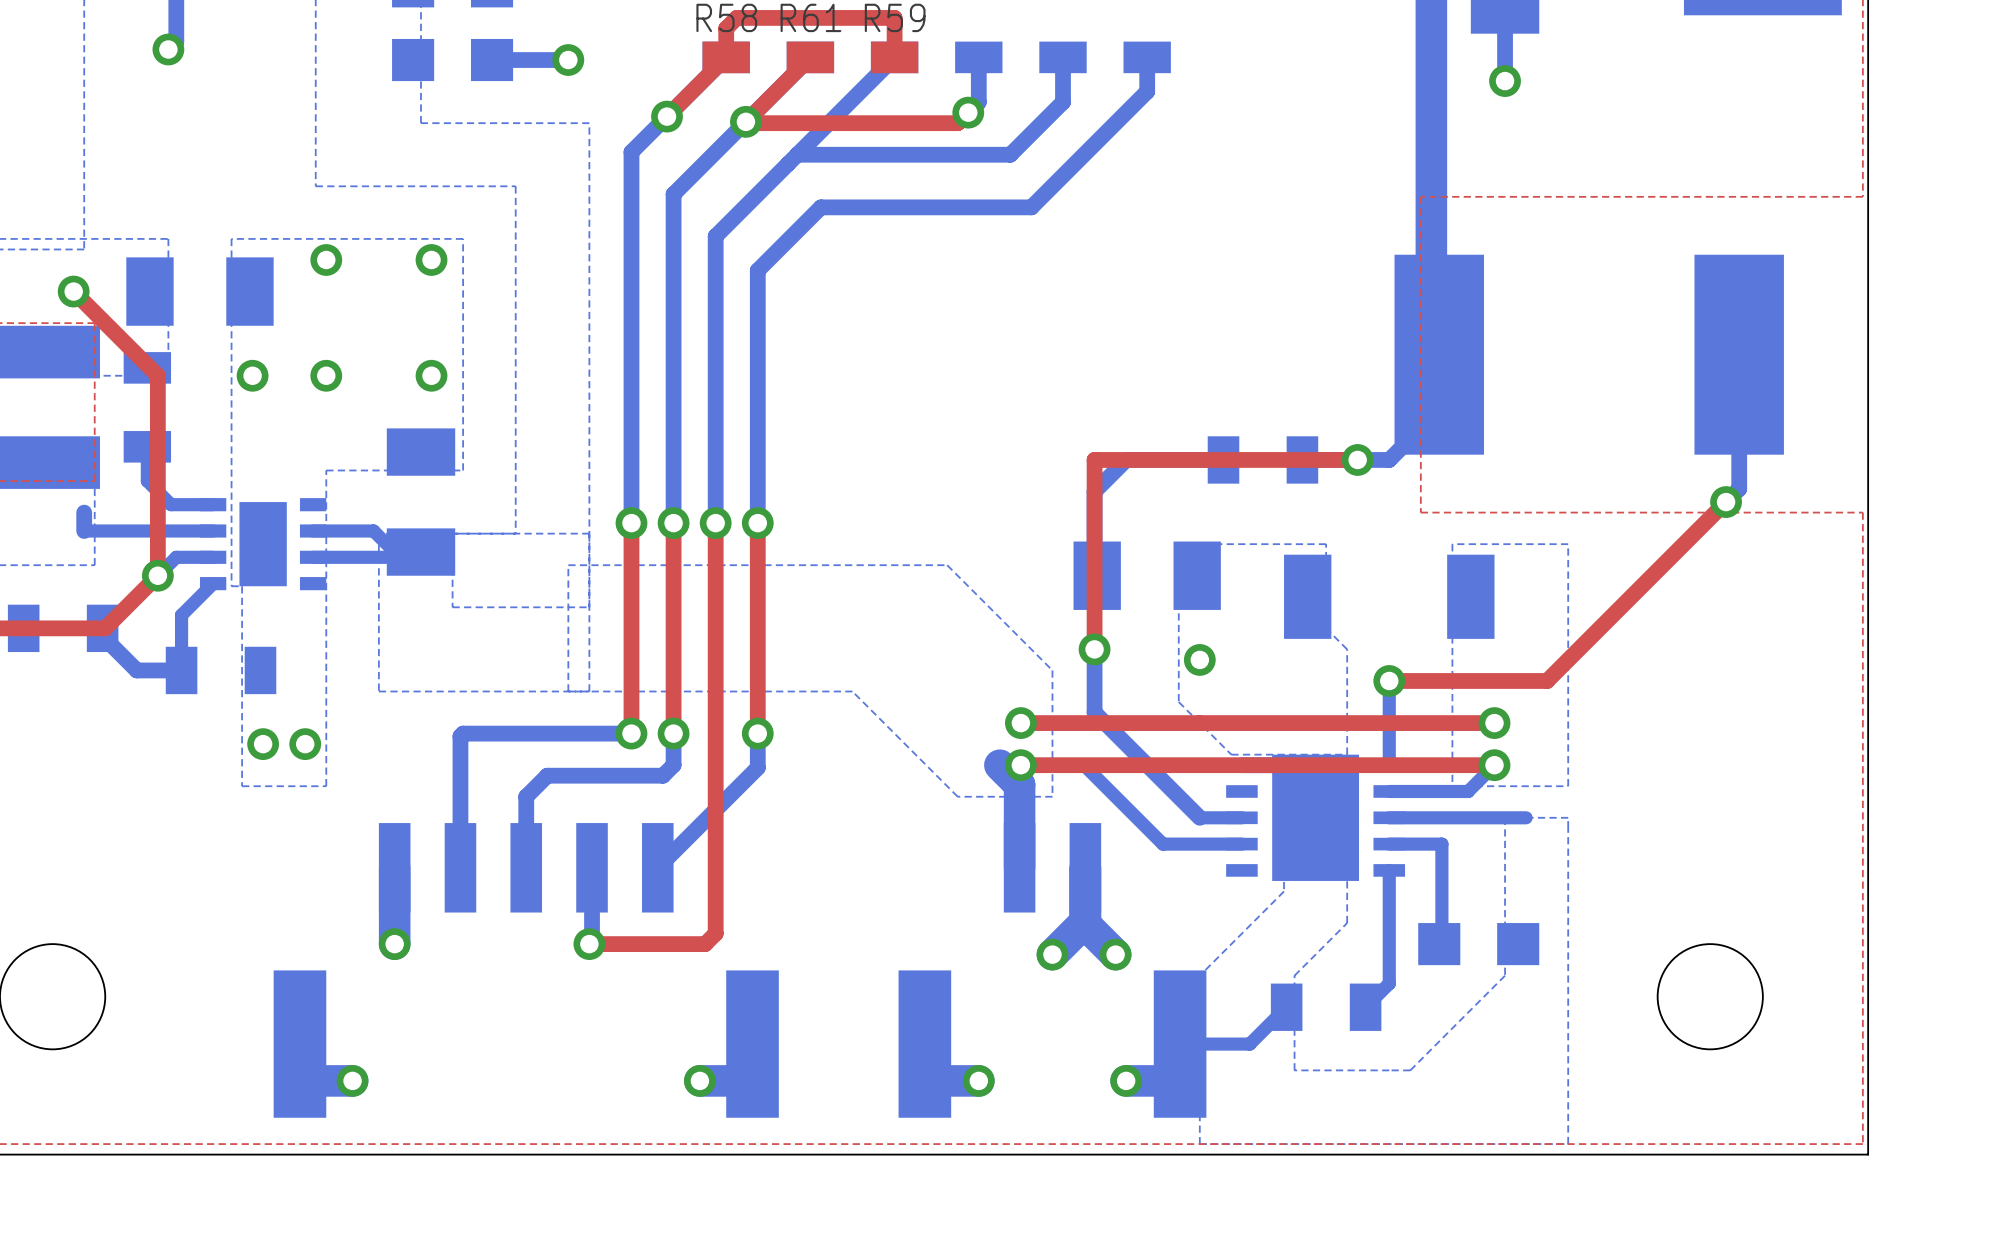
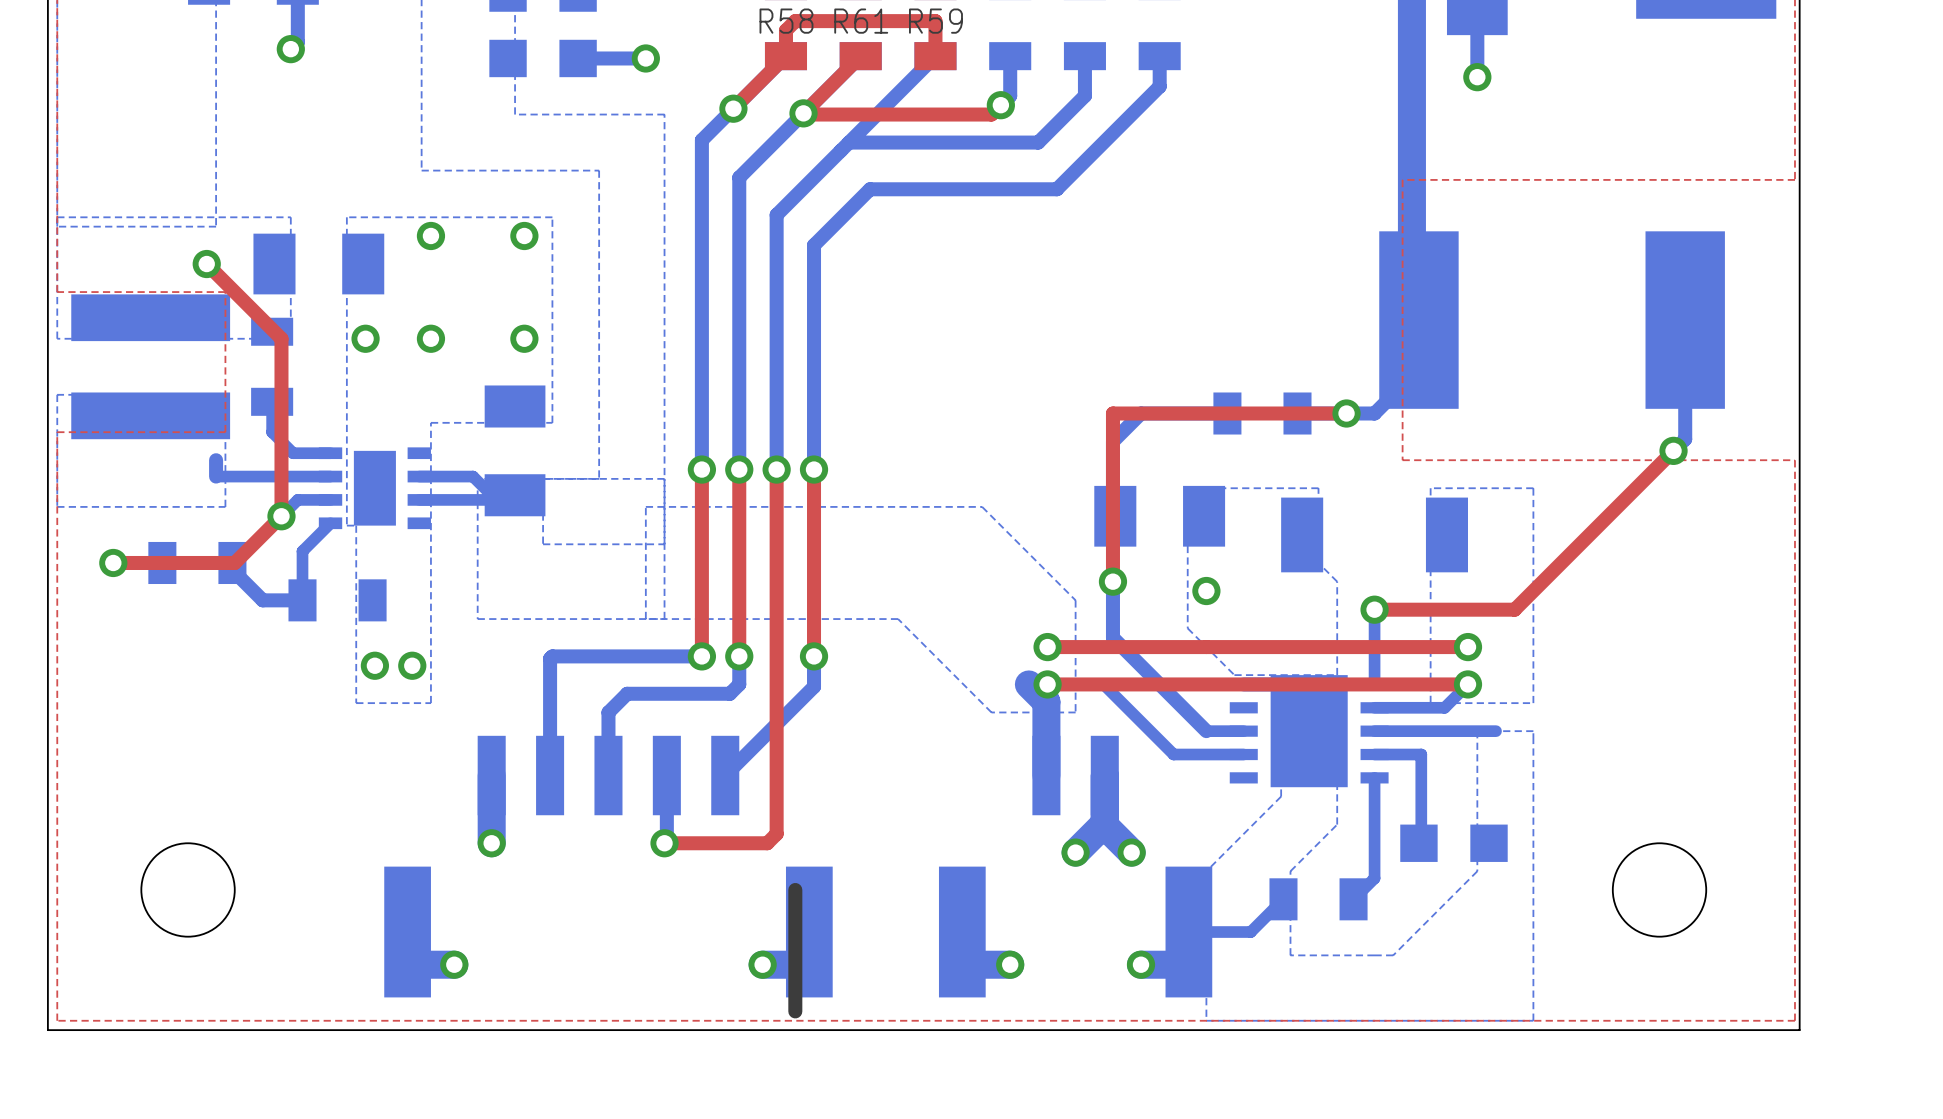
line: none -> (795, 889) (795, 1011)

